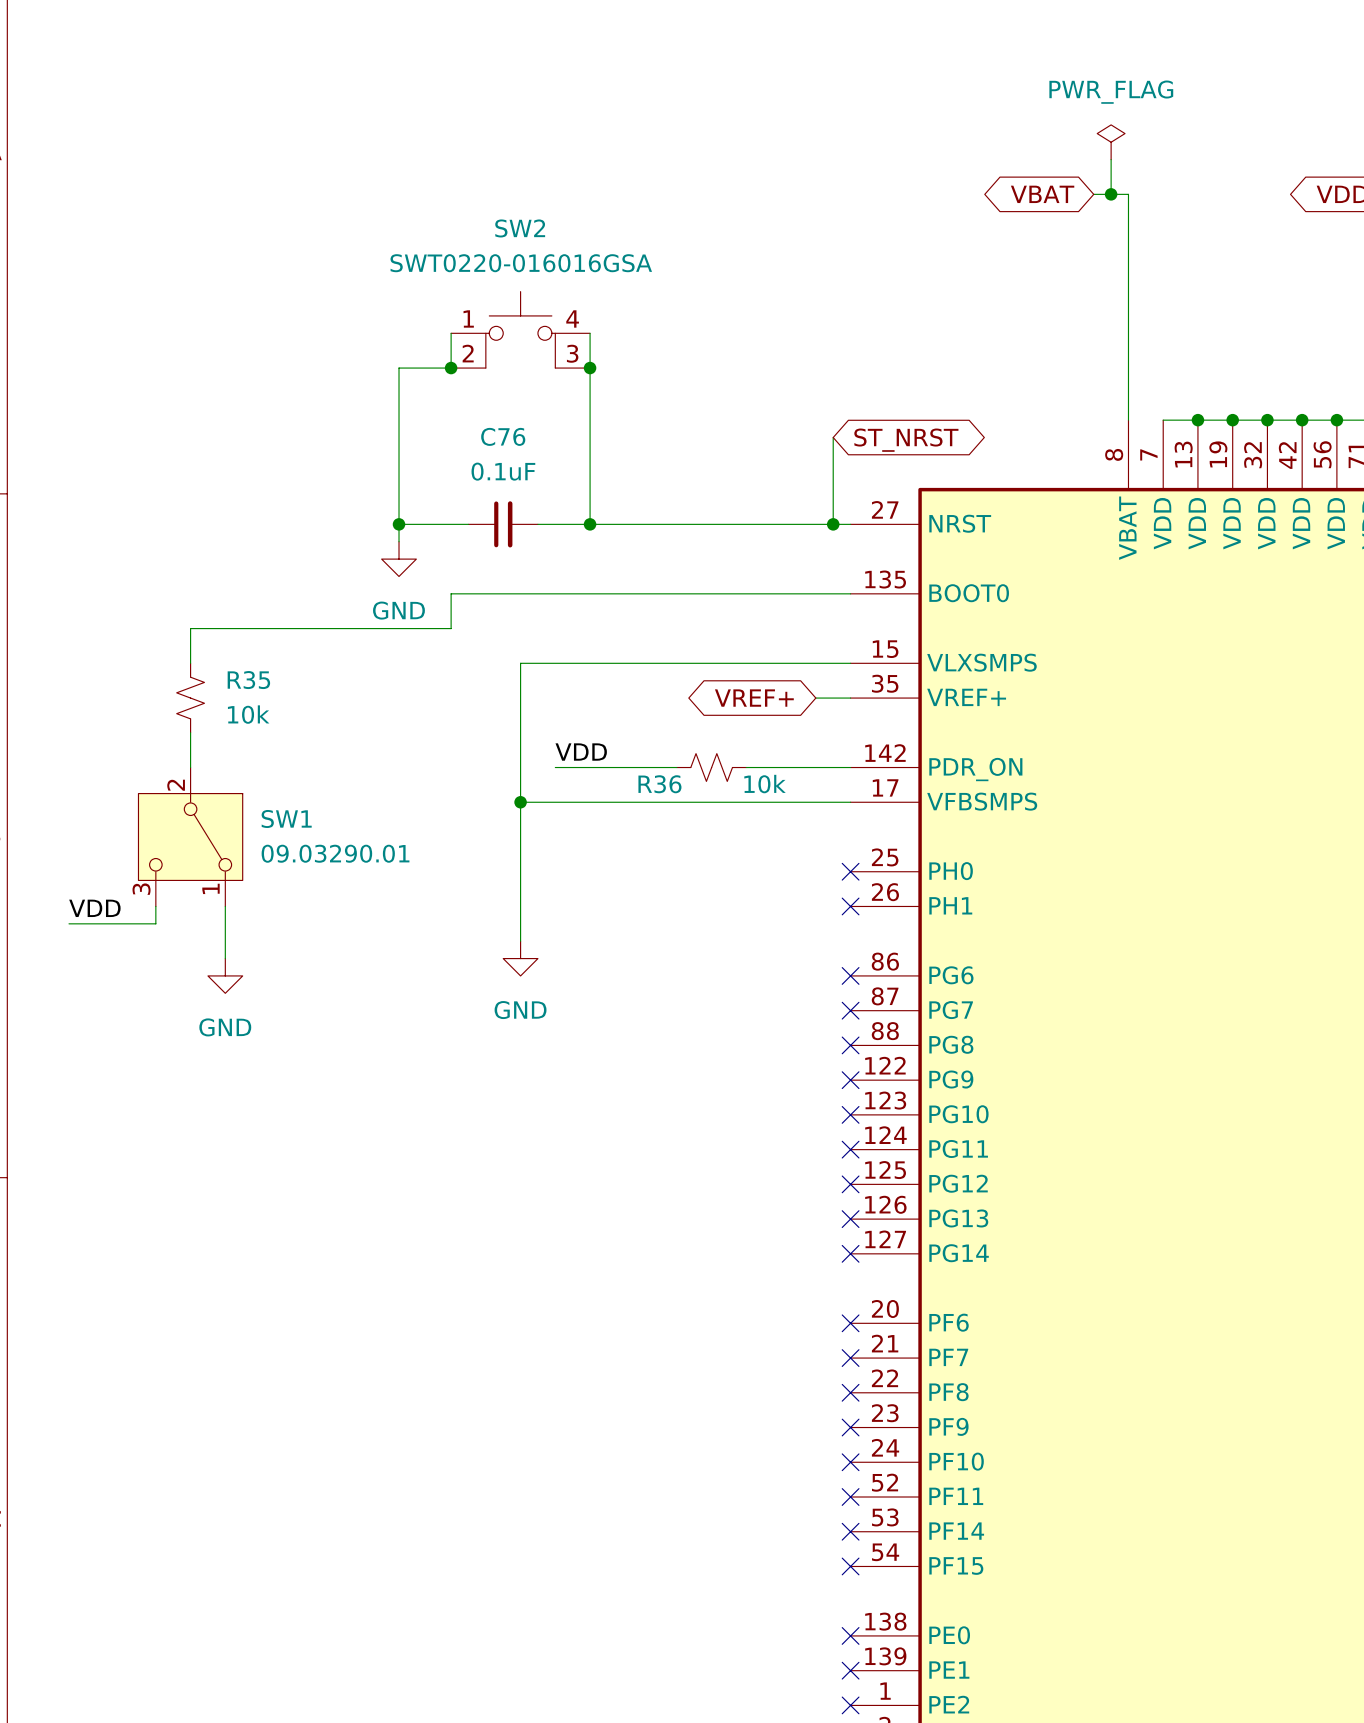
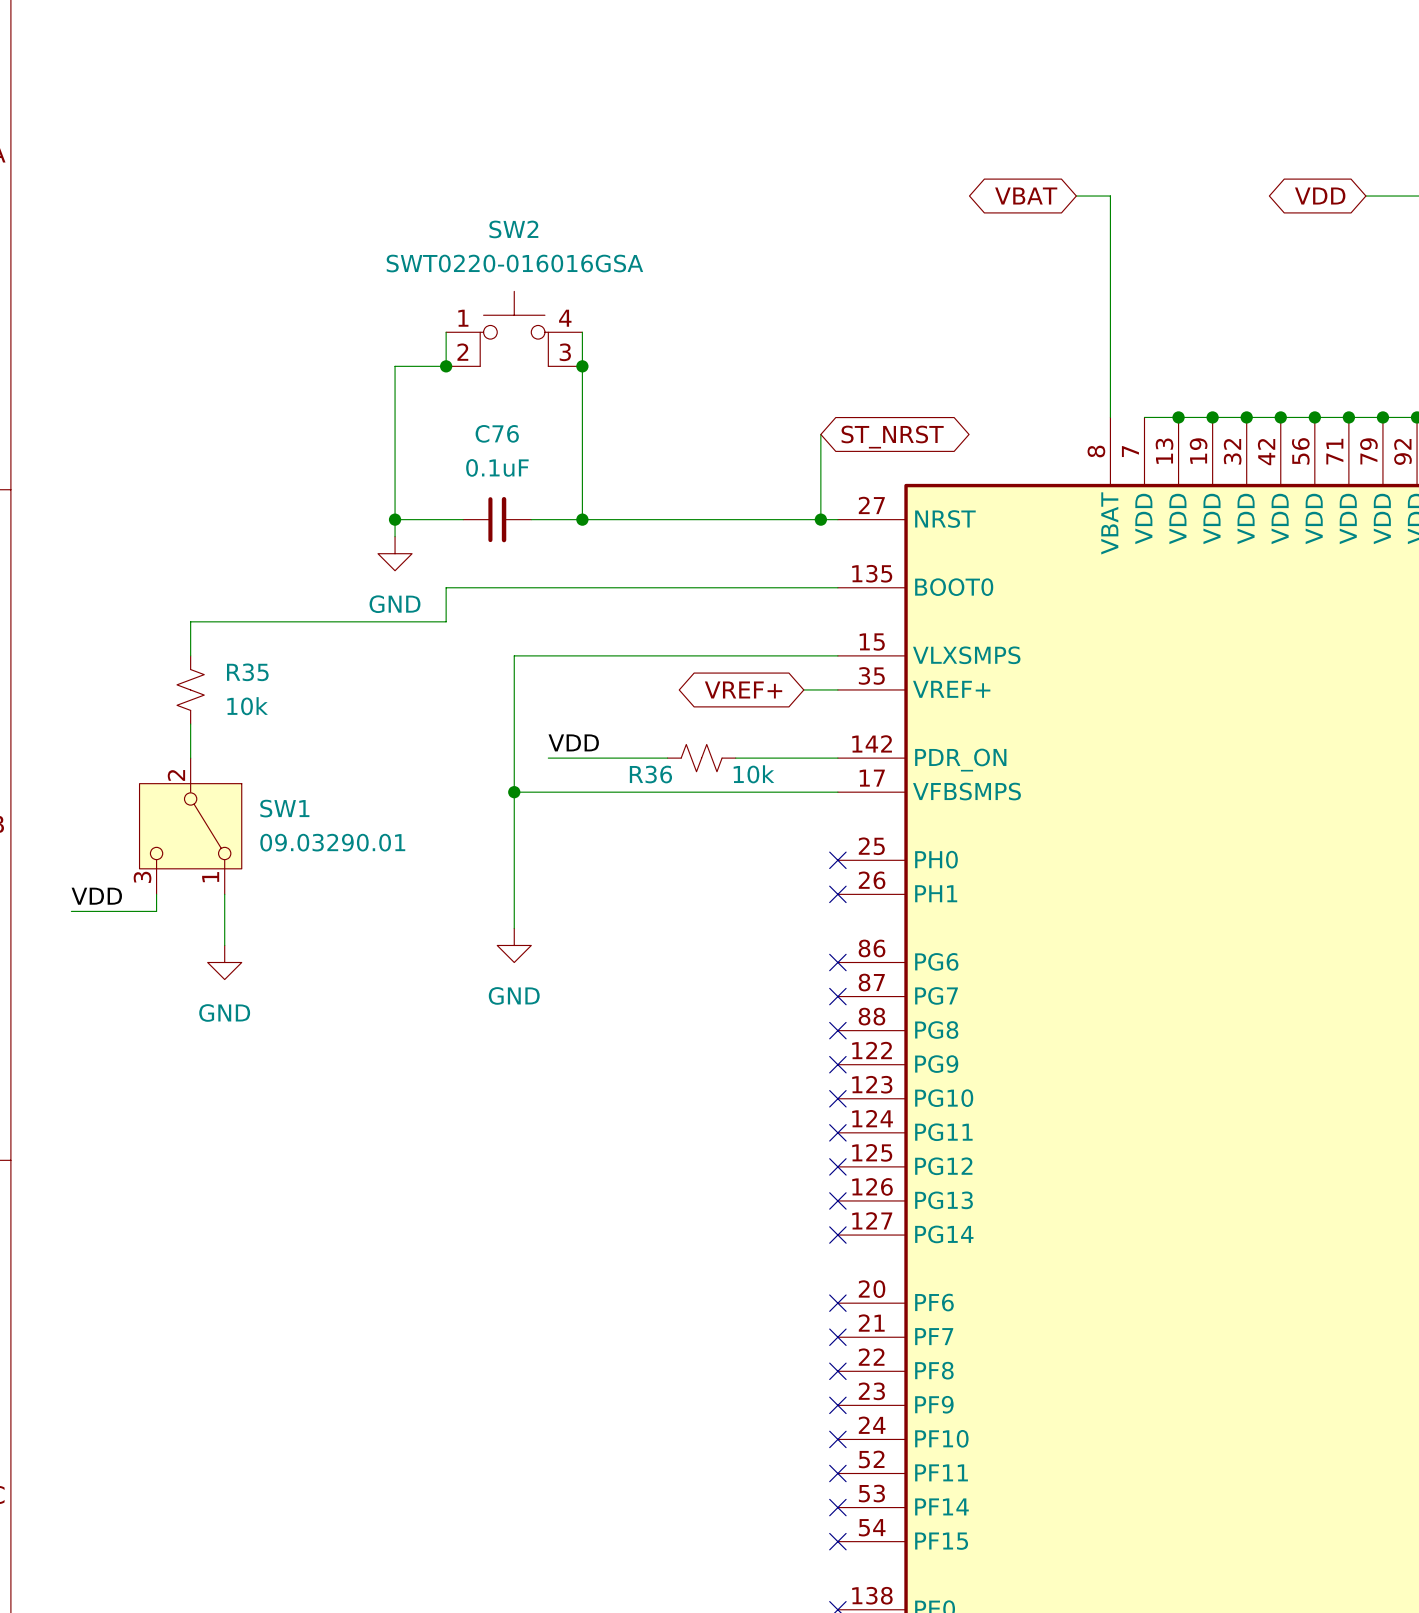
power symbol: PWR_FLAG (1111, 142) -> none
wire: (1111, 159) (1111, 194) -> none
junction: (1111, 194) -> none

